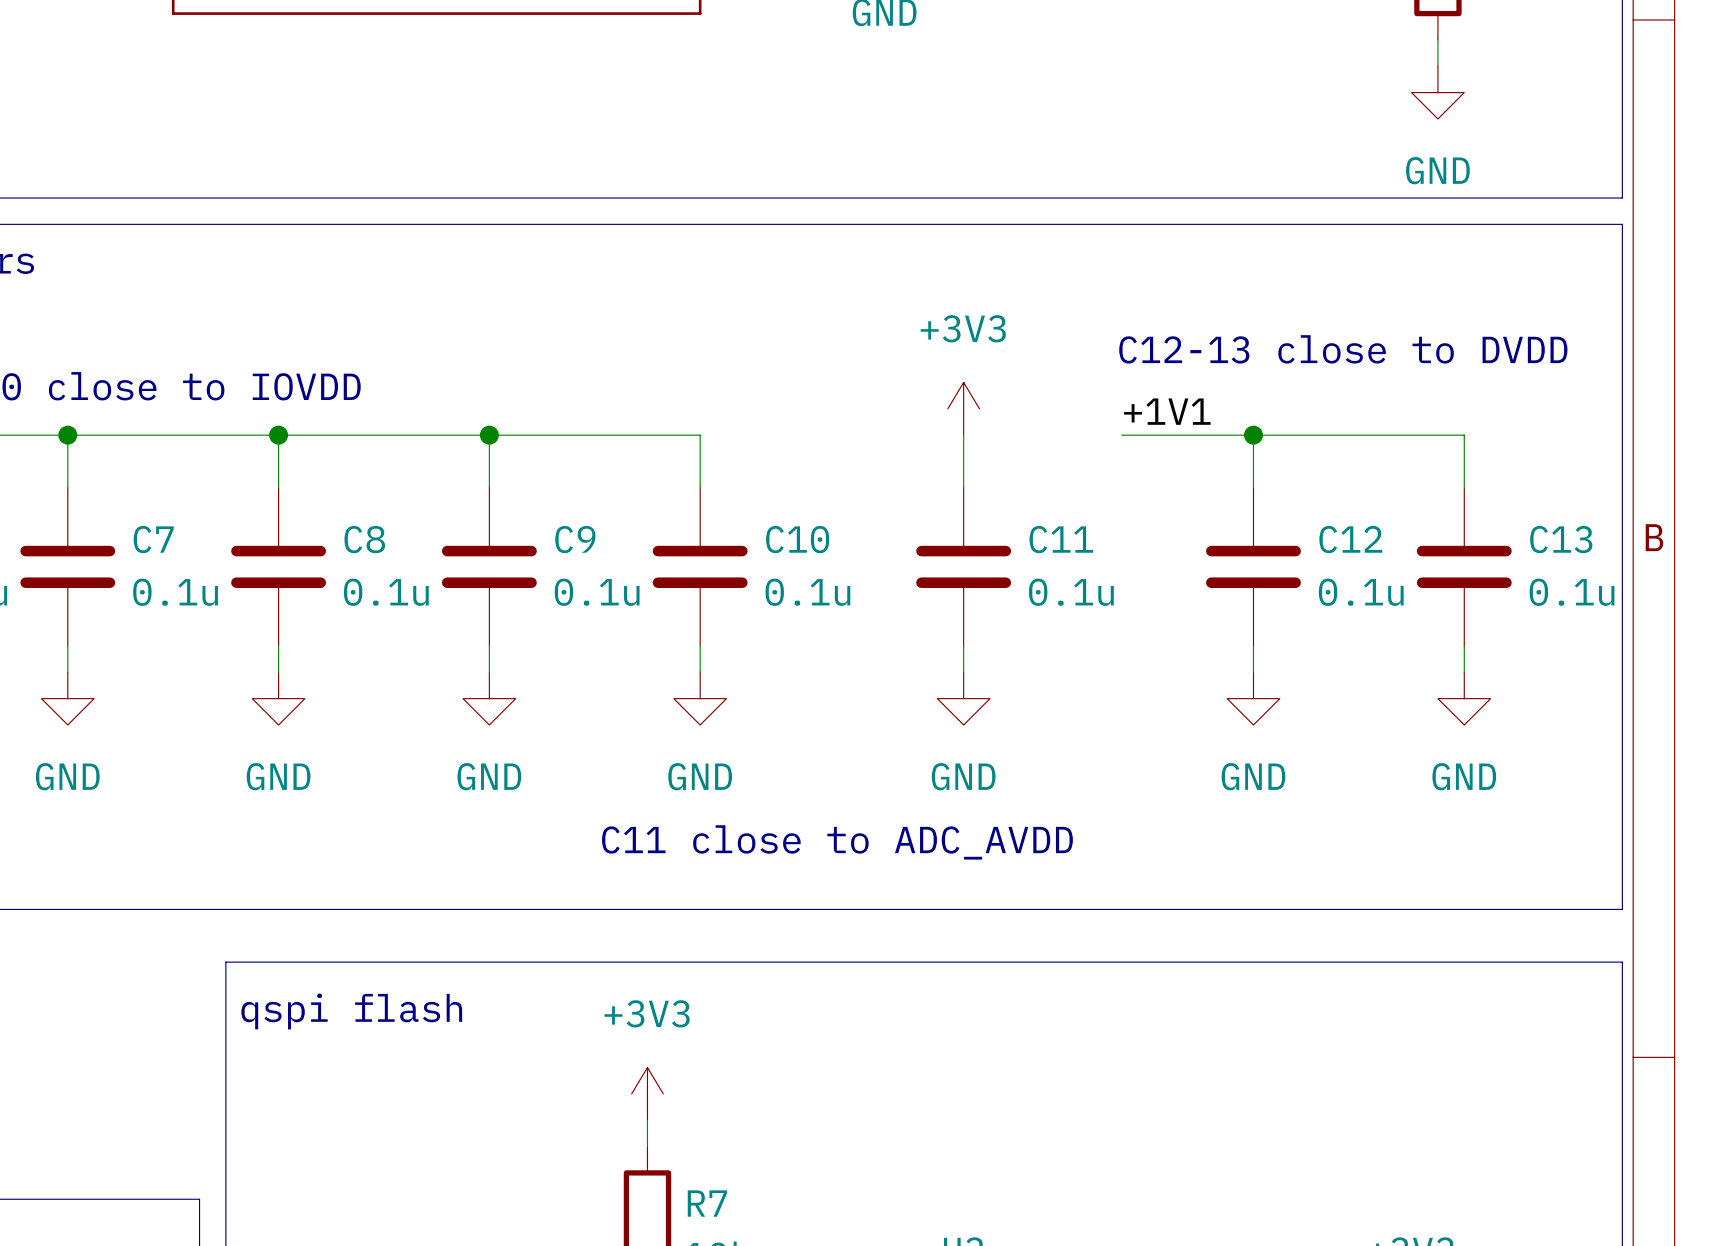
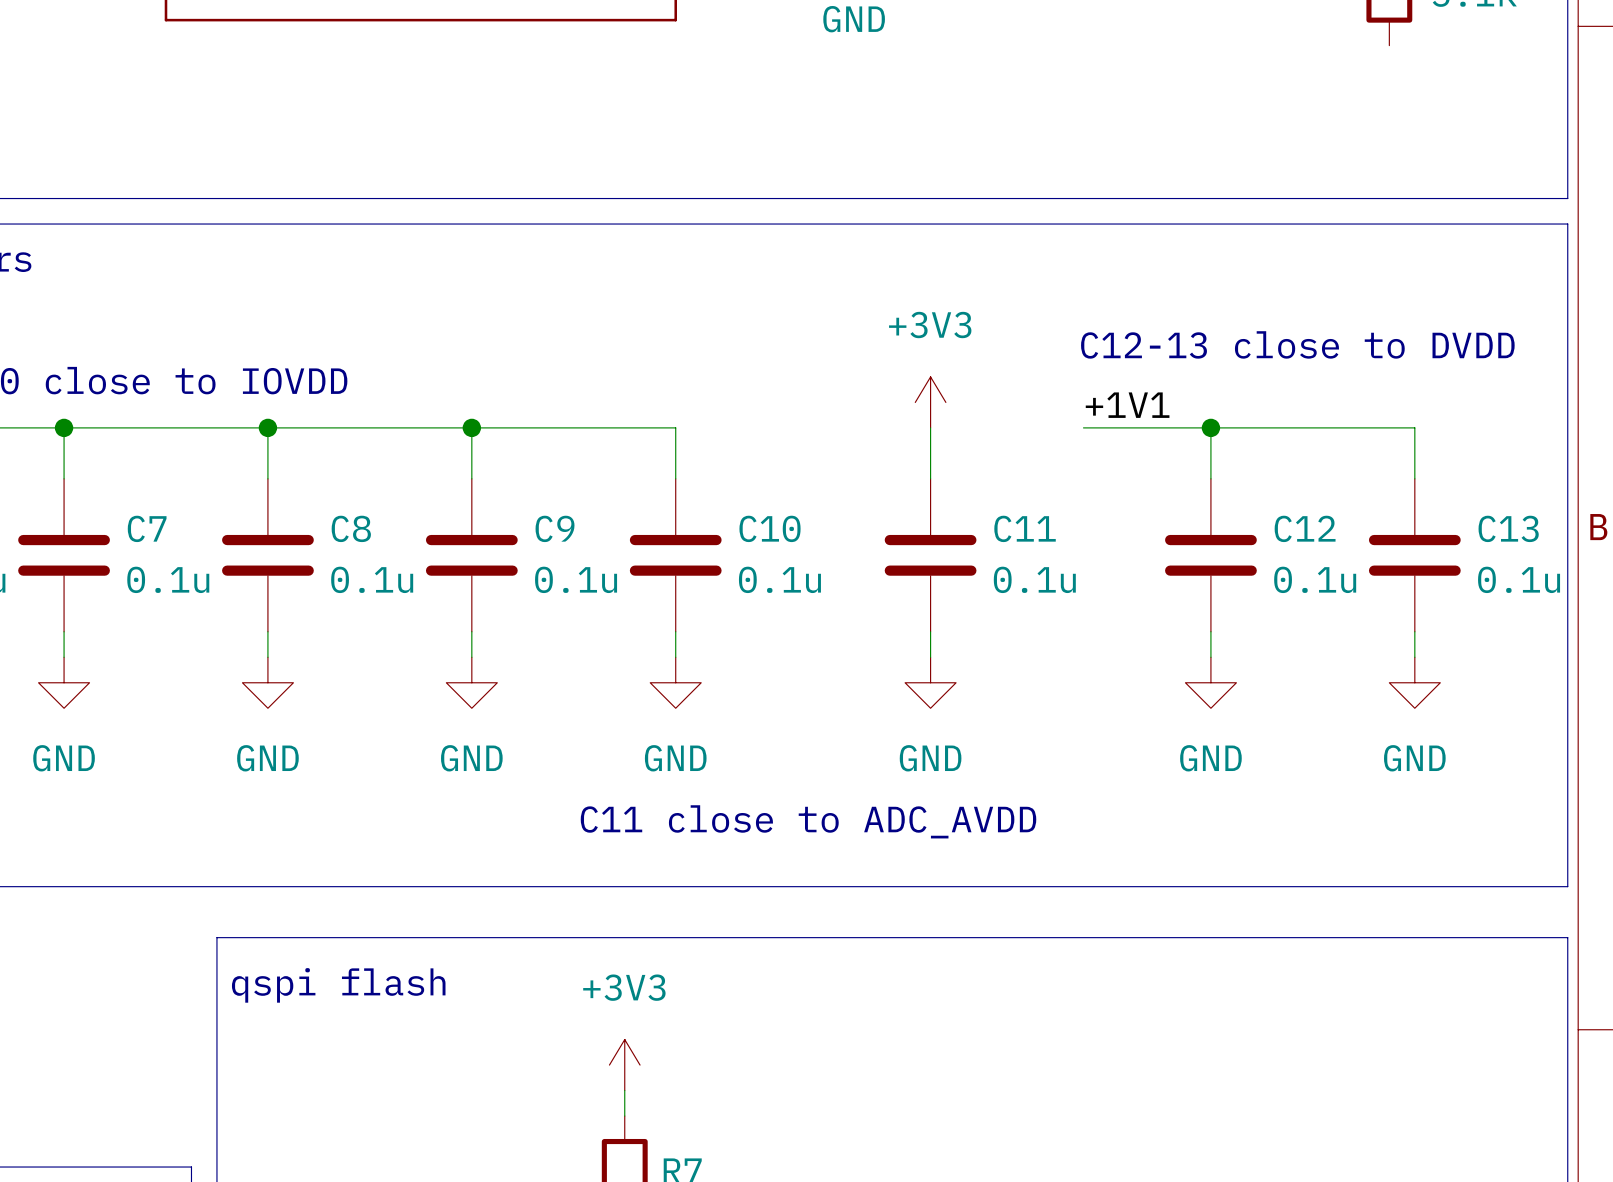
wire: (1437, 39) (1437, 66) -> none
power symbol: GND (1437, 92) -> none

